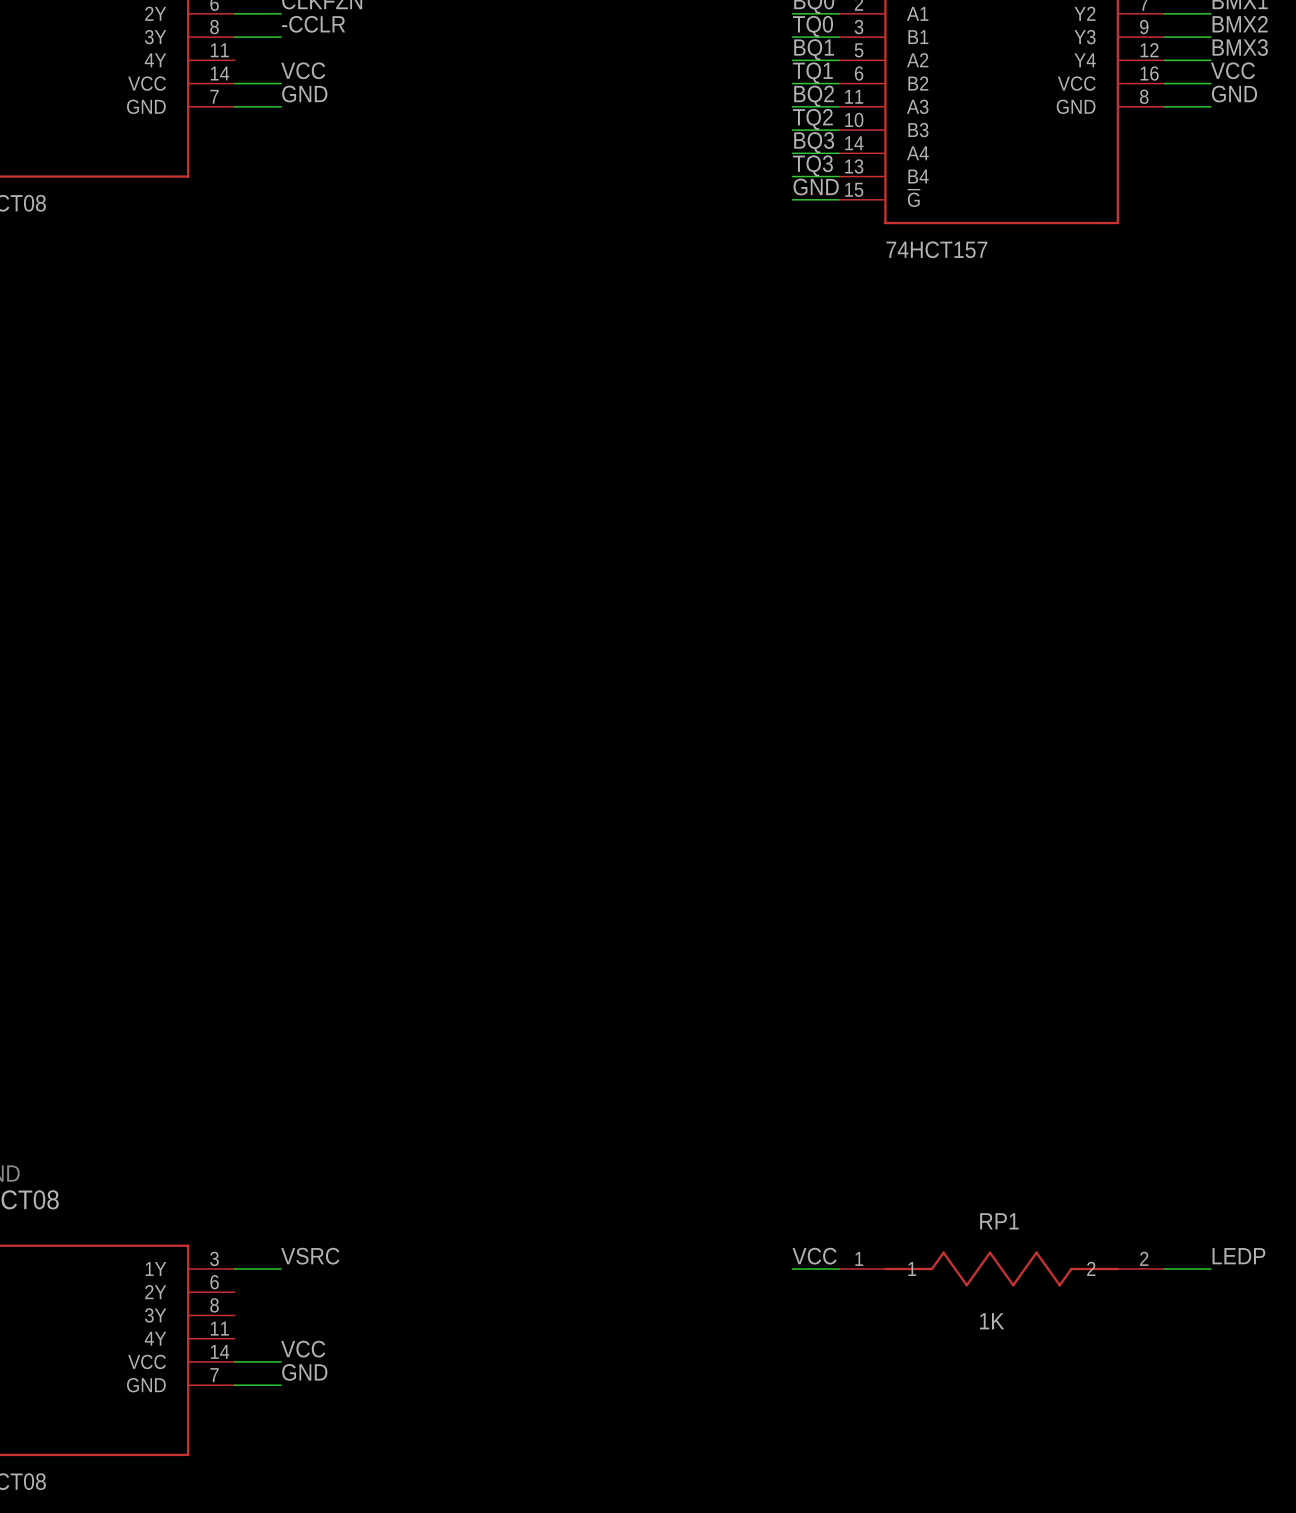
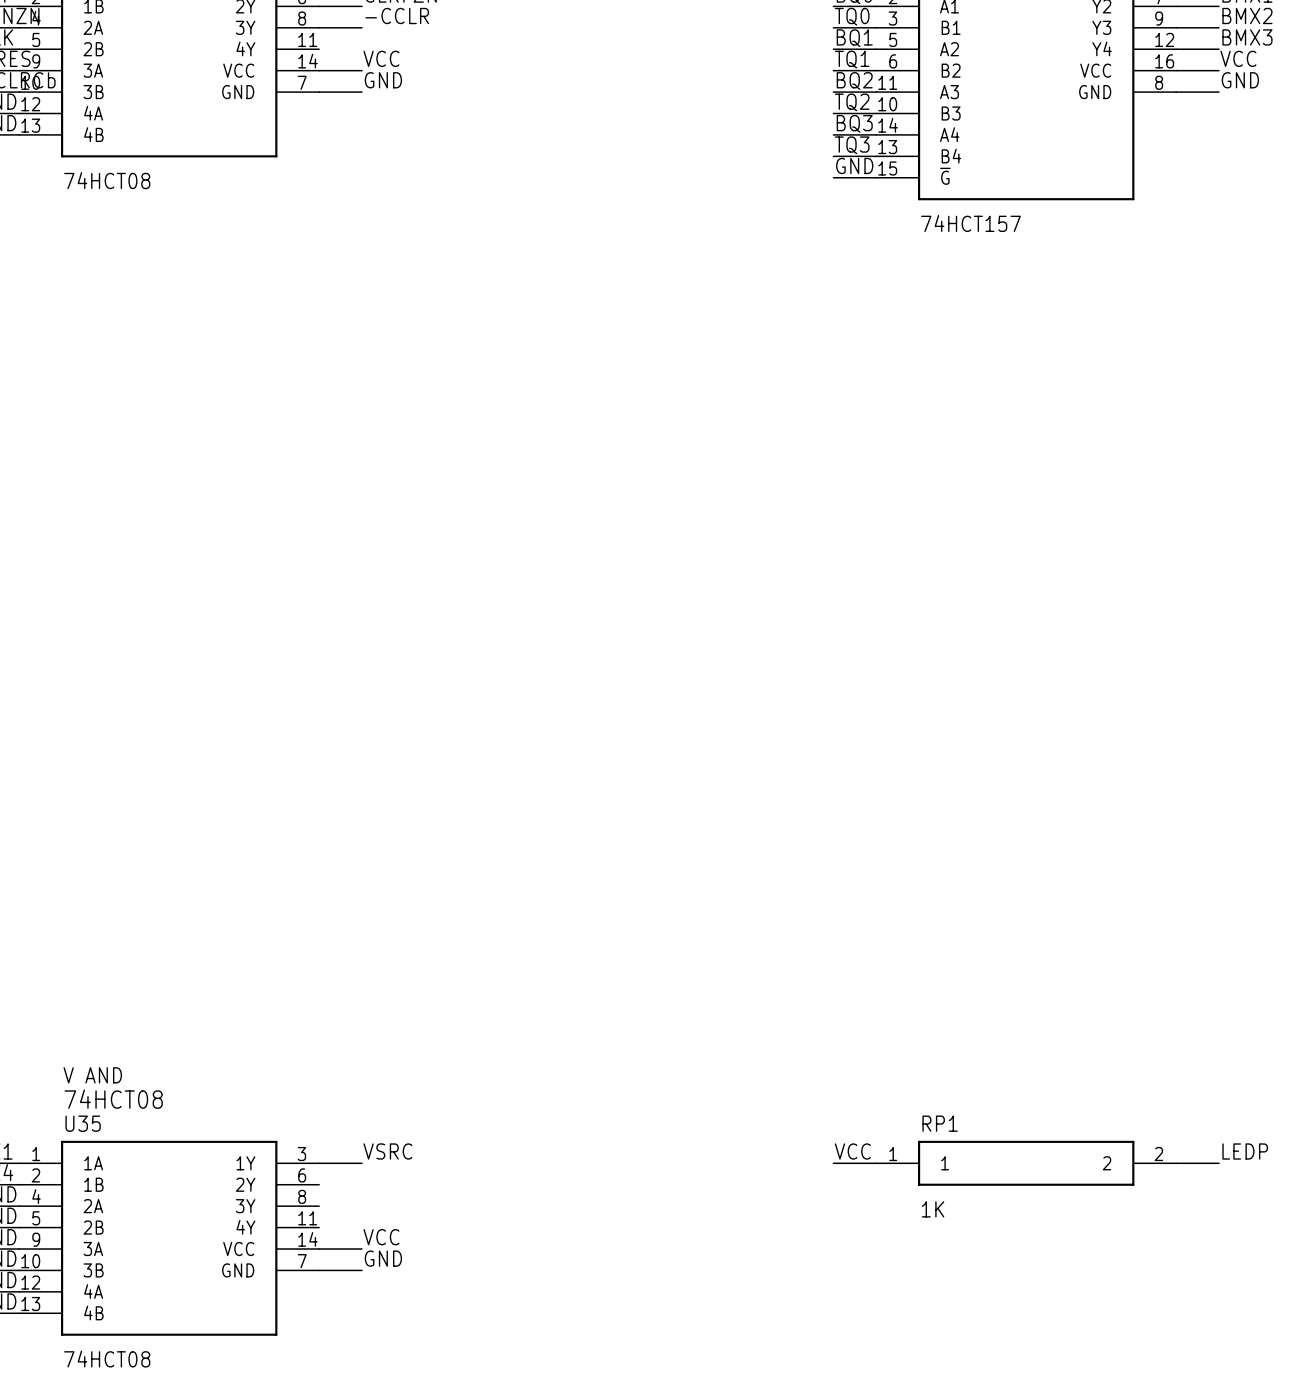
RP1 name position: RP1 (999, 1221) -> RP1 (940, 1123)
RP1 symbol: [838, 1251, 1165, 1287] -> [876, 1140, 1177, 1186]
RP1 value position: 1K (992, 1321) -> 1K (933, 1209)

